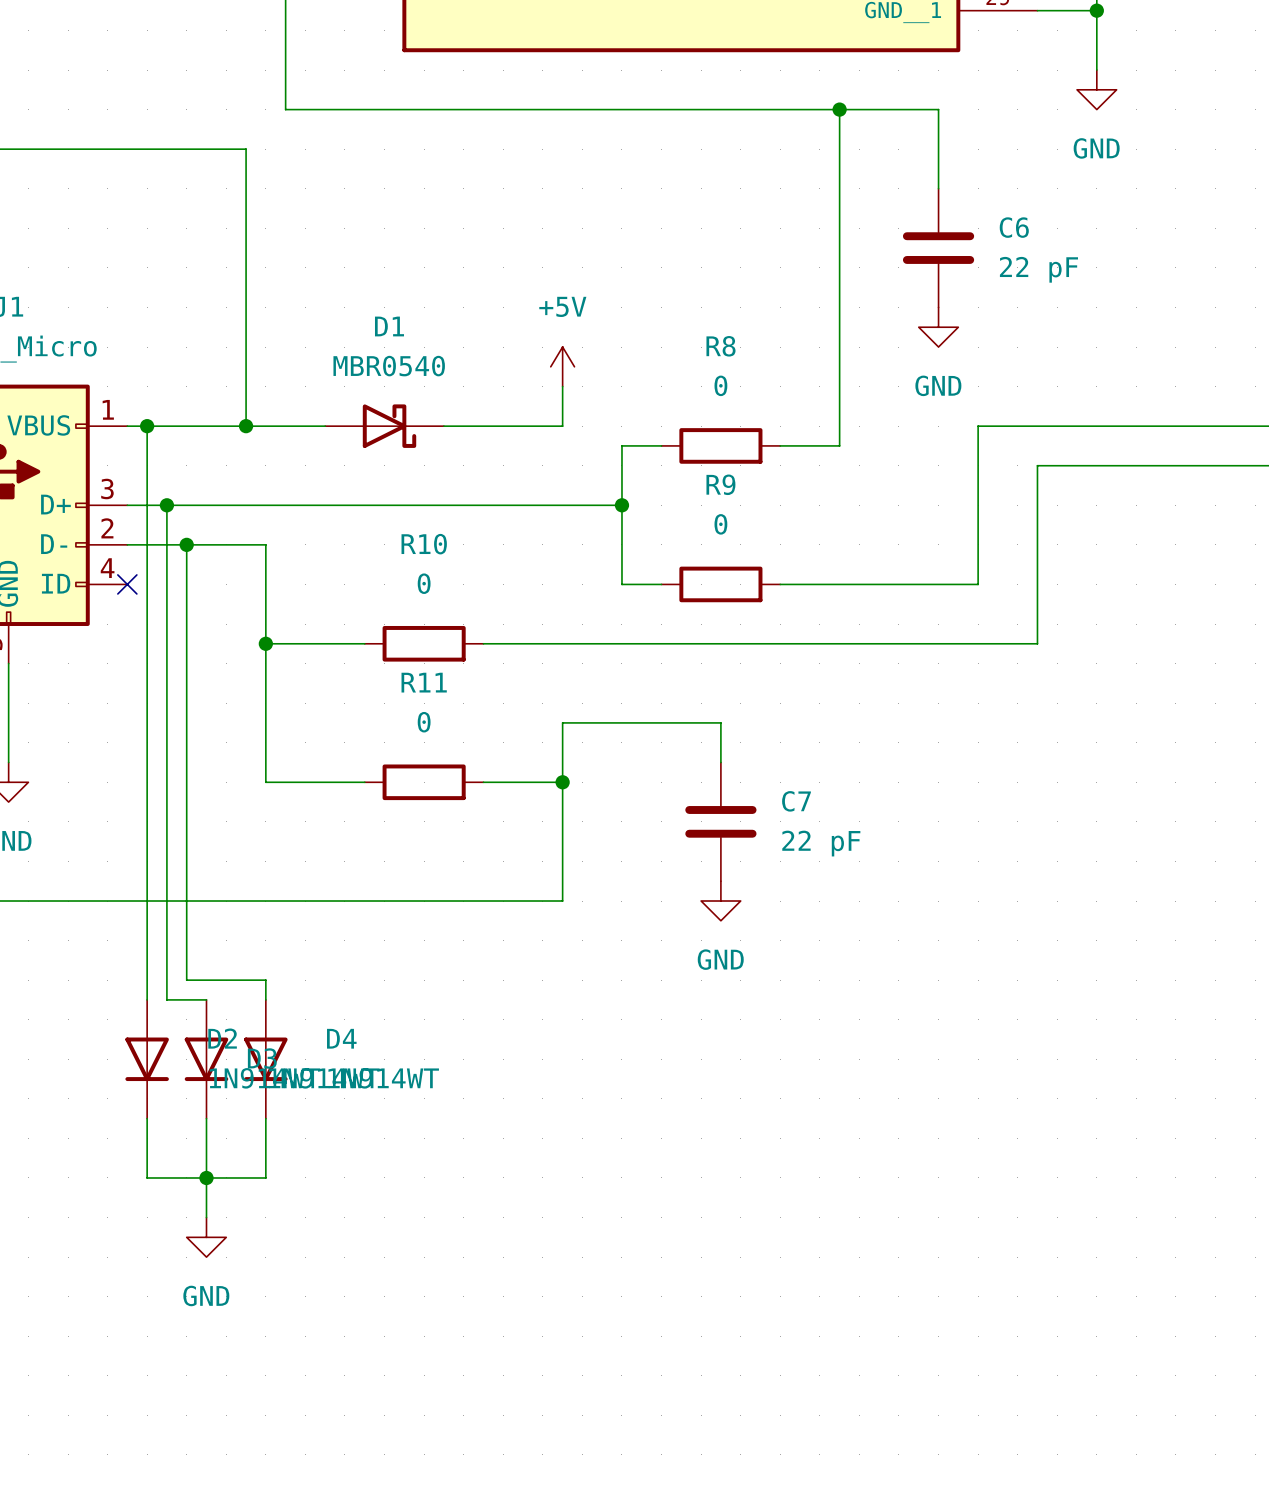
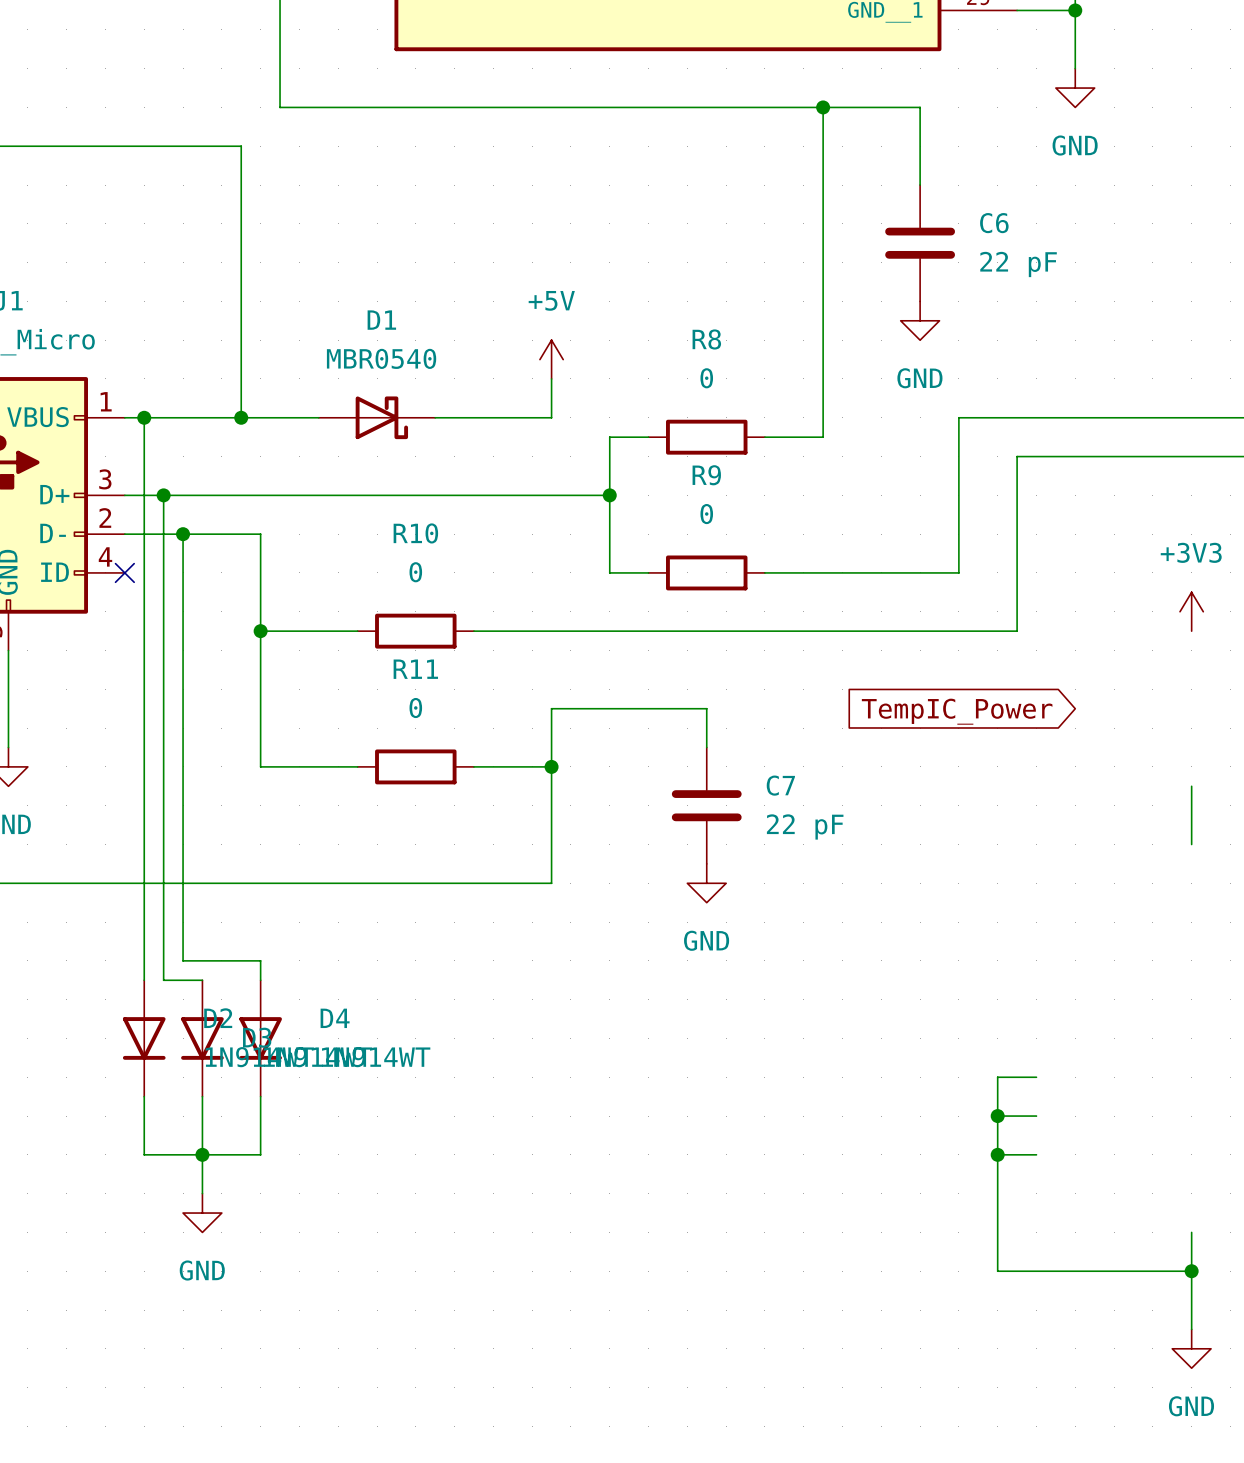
power symbol: none -> +3V3 (1191, 611)
global label: none -> TempIC_Power (957, 711)
wire: none -> (1191, 786) (1191, 844)
wire: none -> (1036, 1077) (997, 1077) (997, 1271) (1191, 1271)
wire: none -> (997, 1116) (1036, 1116)
junction: none -> (997, 1116)
wire: none -> (997, 1154) (1036, 1154)
junction: none -> (997, 1154)
wire: none -> (1191, 1232) (1191, 1329)
junction: none -> (1191, 1271)
power symbol: none -> GND (1191, 1348)

